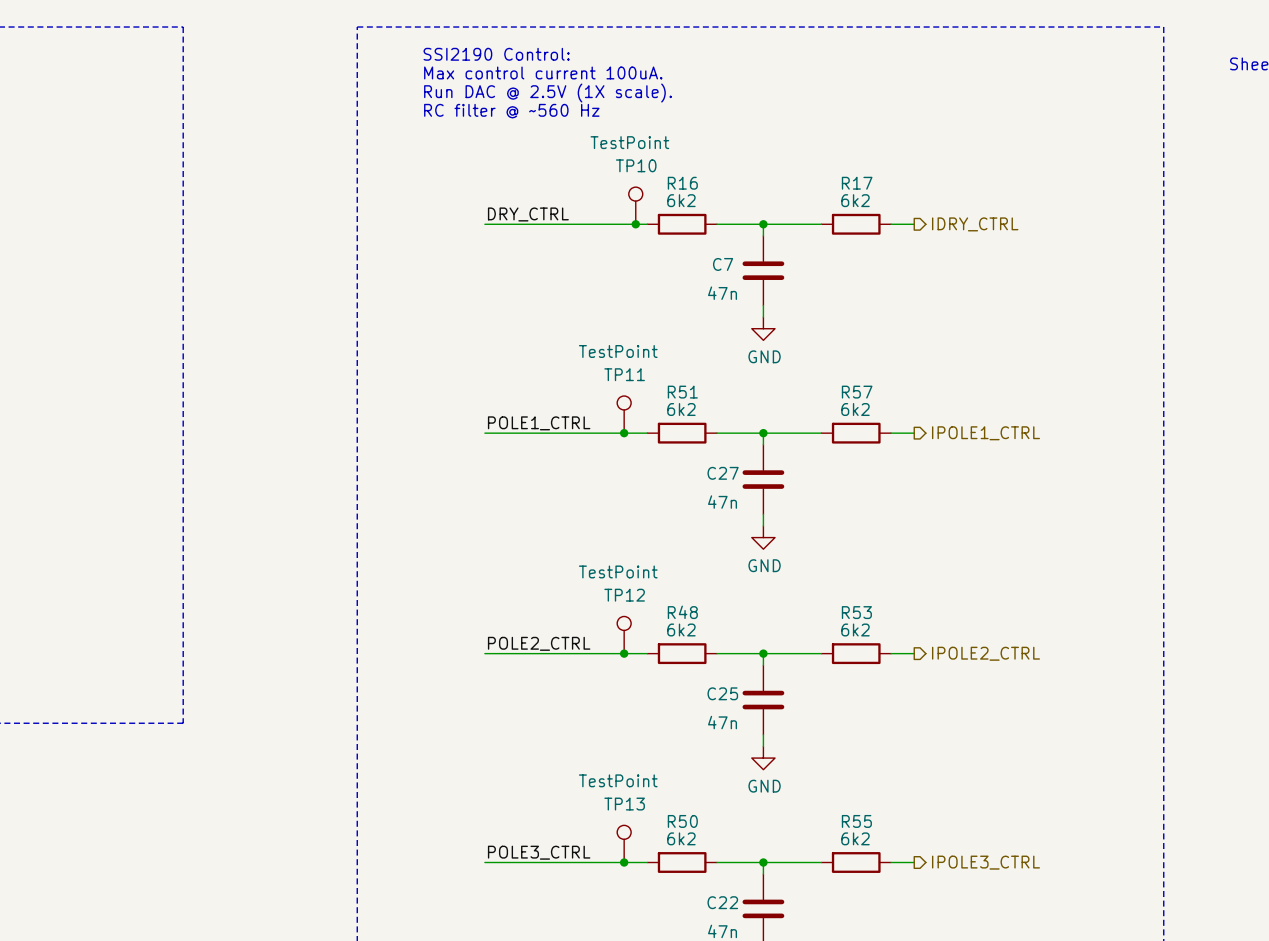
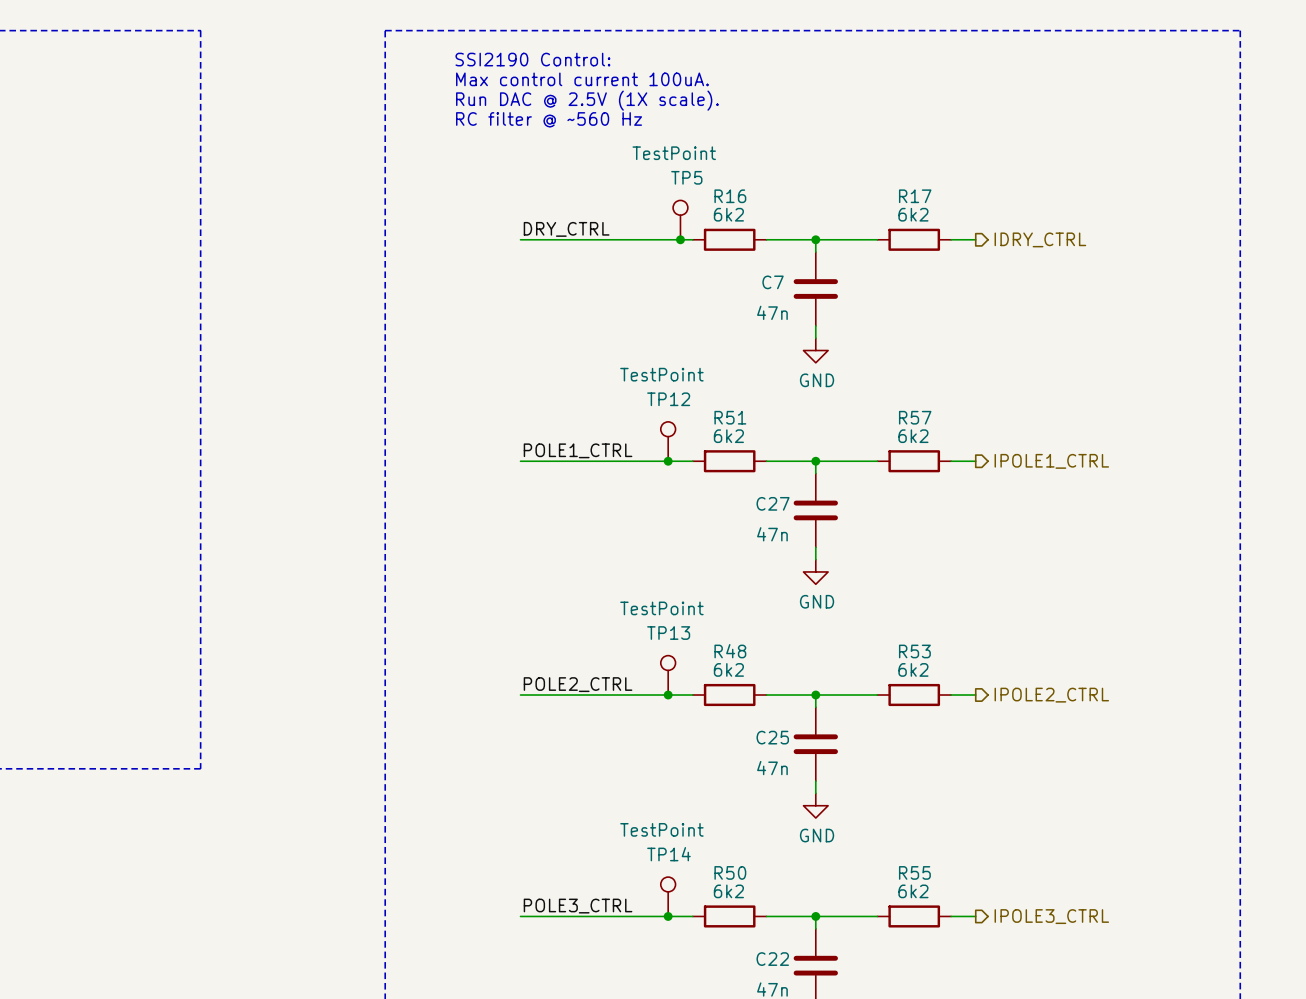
TP10 name: TP10 (636, 165) -> TP5 (686, 177)
TP11 name: TP11 (624, 374) -> TP12 (668, 399)
TP12 name: TP12 (624, 595) -> TP13 (668, 633)
TP13 name: TP13 (624, 804) -> TP14 (668, 854)

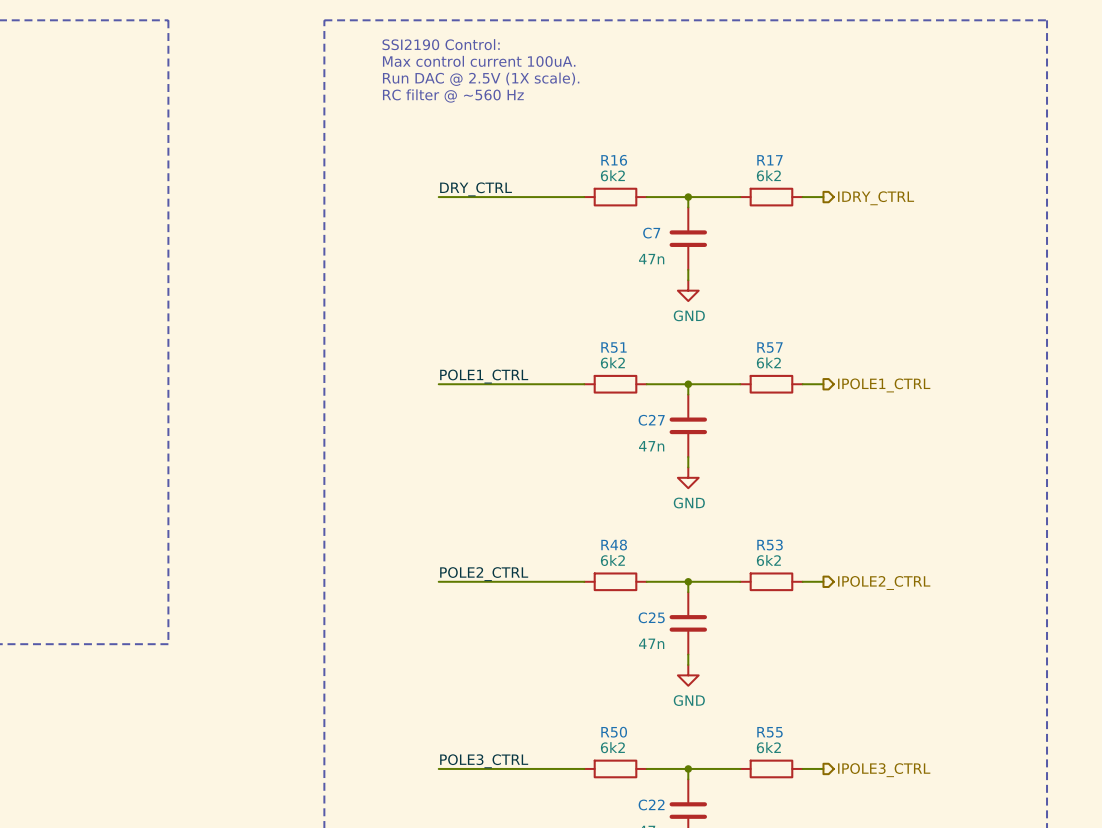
TP5: TestPoint (680, 220) -> none
junction: (680, 239) -> none
TP12: TestPoint (668, 441) -> none
junction: (668, 461) -> none
TP13: TestPoint (668, 675) -> none
junction: (668, 695) -> none
TP14: TestPoint (668, 896) -> none
junction: (668, 916) -> none

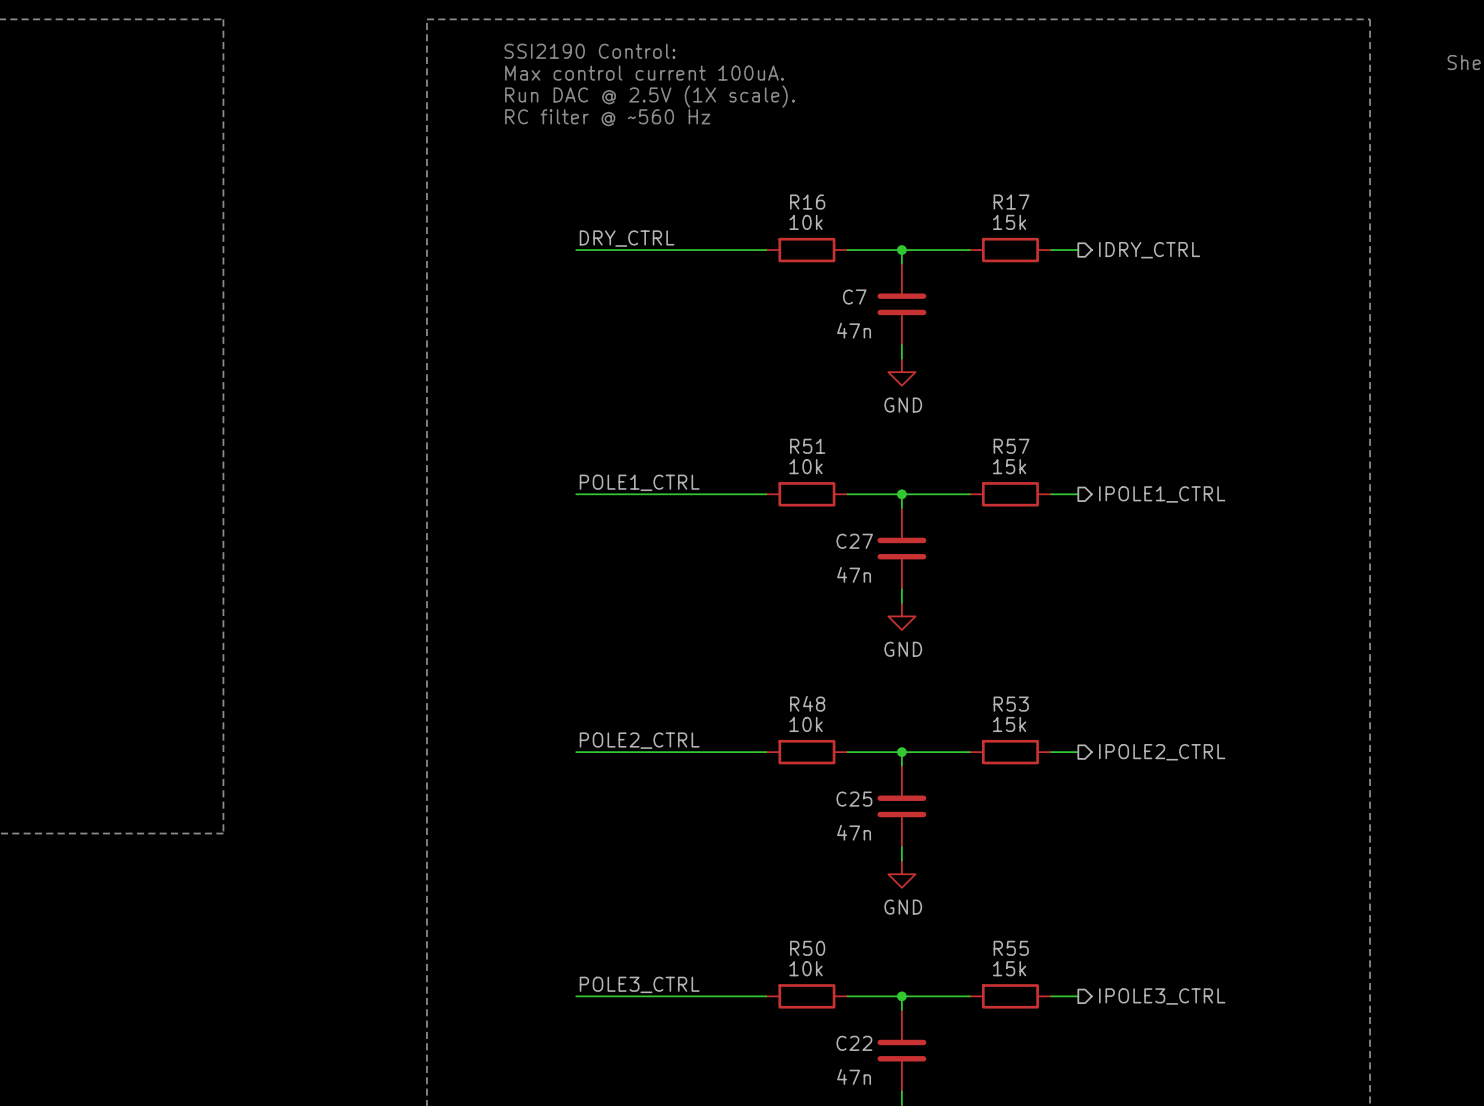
R16 value: 6k2 (612, 175) -> 10k (806, 222)
R17 value: 6k2 (768, 175) -> 15k (1009, 222)
R51 value: 6k2 (612, 362) -> 10k (806, 466)
R57 value: 6k2 (768, 362) -> 15k (1009, 466)
R48 value: 6k2 (612, 560) -> 10k (806, 724)
R53 value: 6k2 (768, 560) -> 15k (1009, 724)
R50 value: 6k2 (612, 747) -> 10k (806, 968)
R55 value: 6k2 (768, 747) -> 15k (1009, 968)

